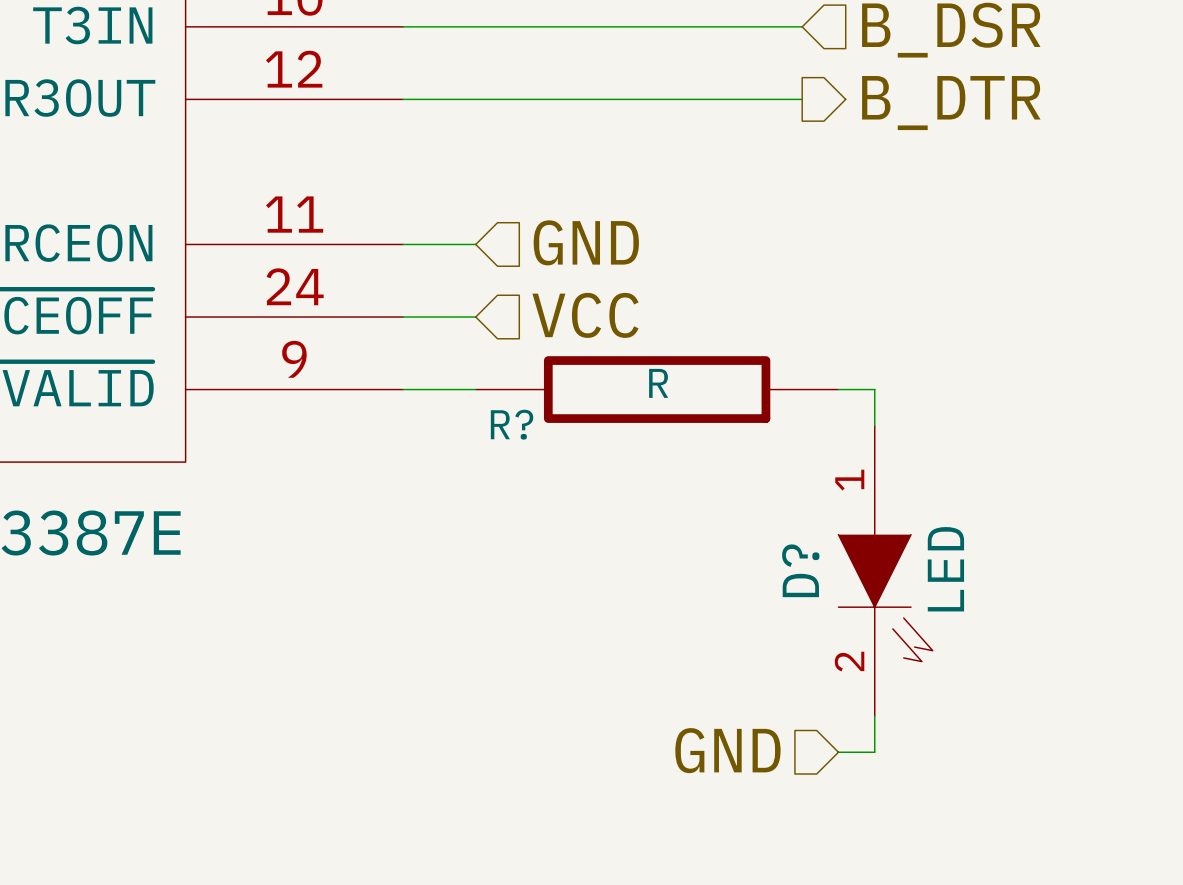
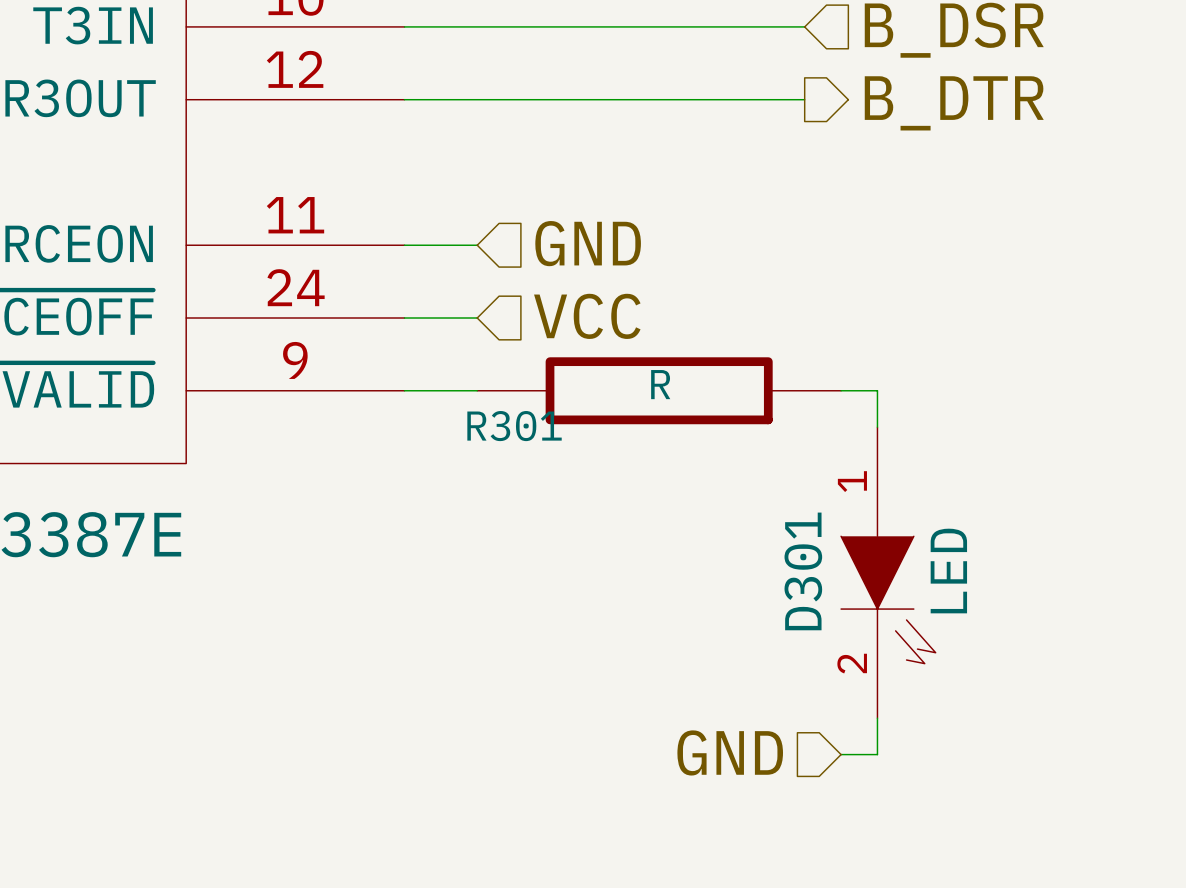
R? name: R? (512, 424) -> R301 (514, 426)
D? name: D? (800, 570) -> D301 (803, 571)

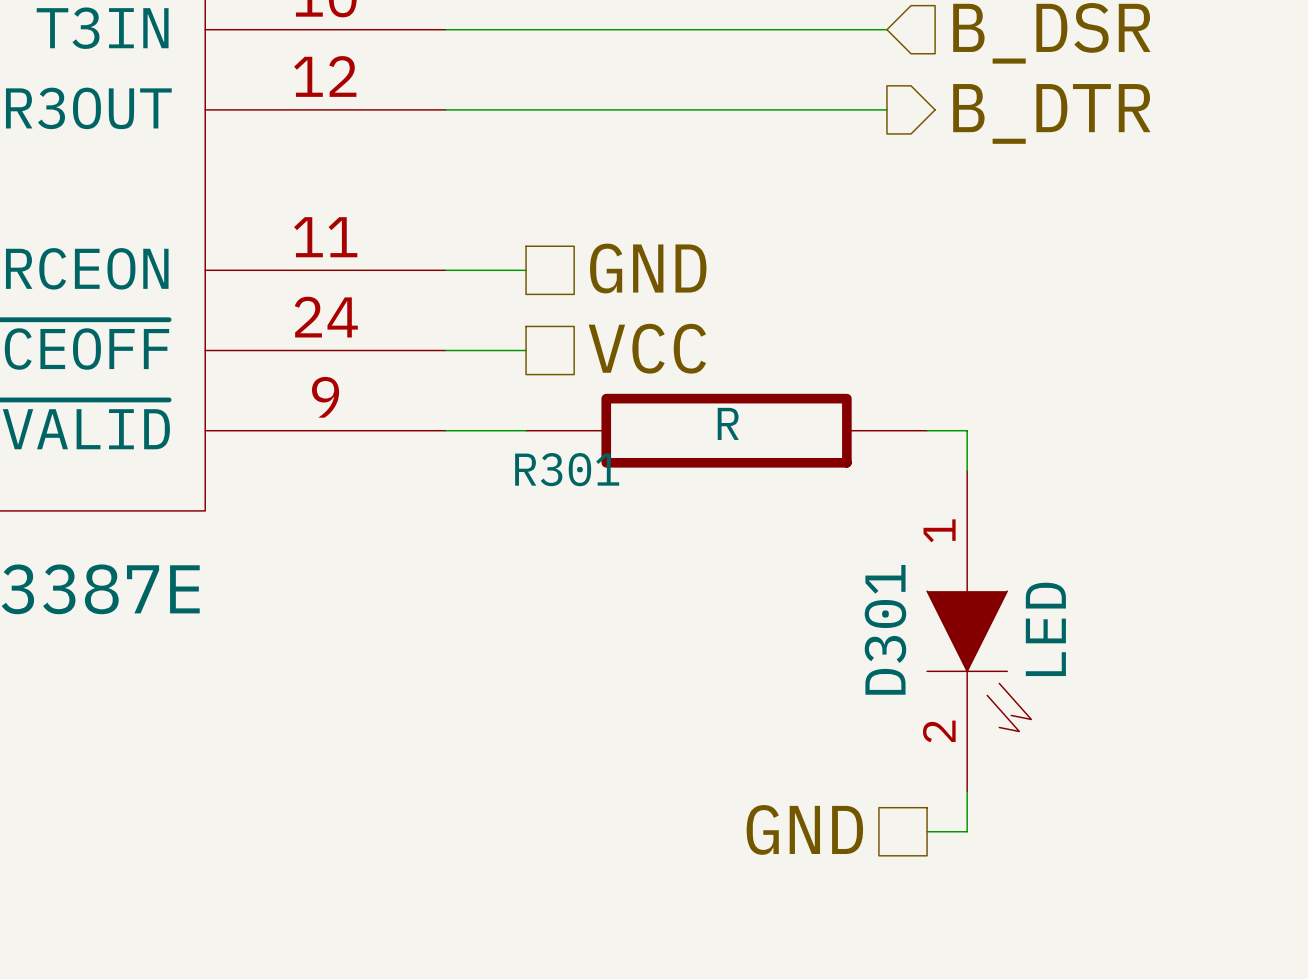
hierarchical label shape: input (588, 243) -> passive (648, 268)
hierarchical label shape: input (587, 316) -> passive (647, 348)
hierarchical label shape: input (730, 752) -> passive (804, 829)

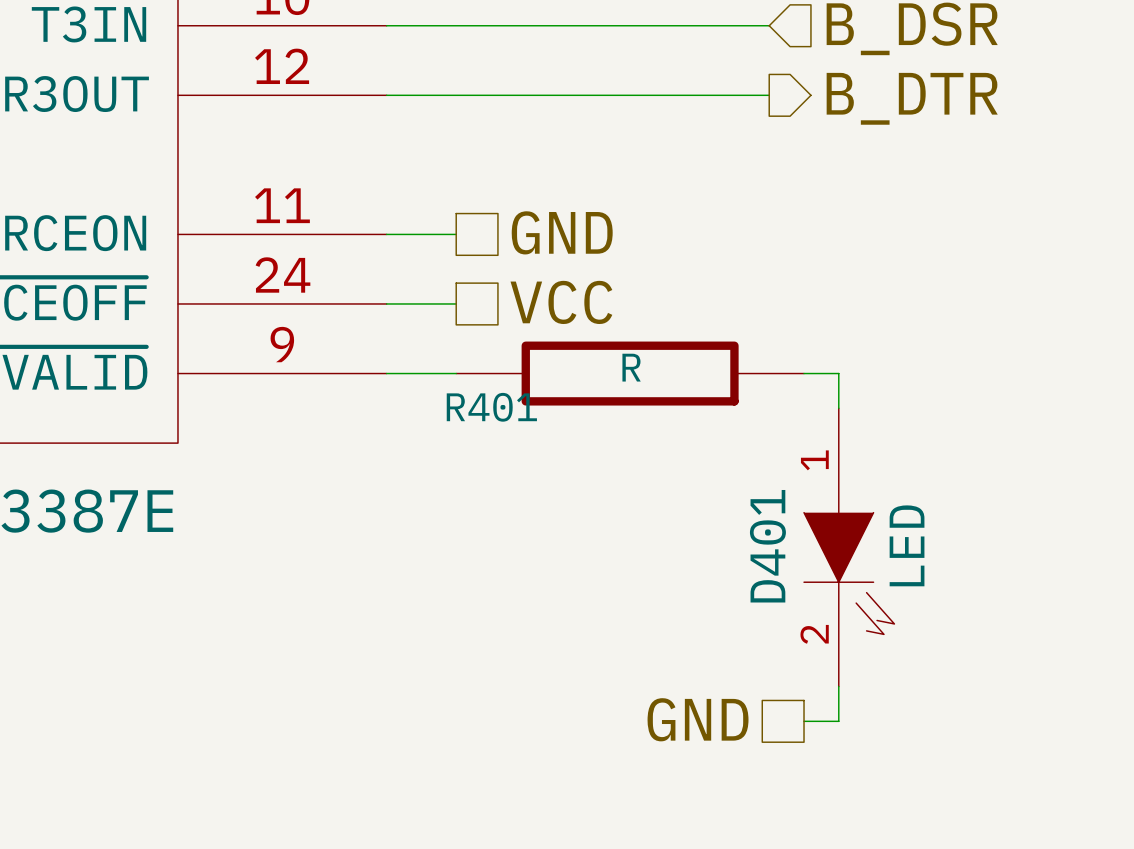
R301 name: R301 (567, 469) -> R401 (491, 407)
D301 name: D301 (885, 629) -> D401 (767, 546)

